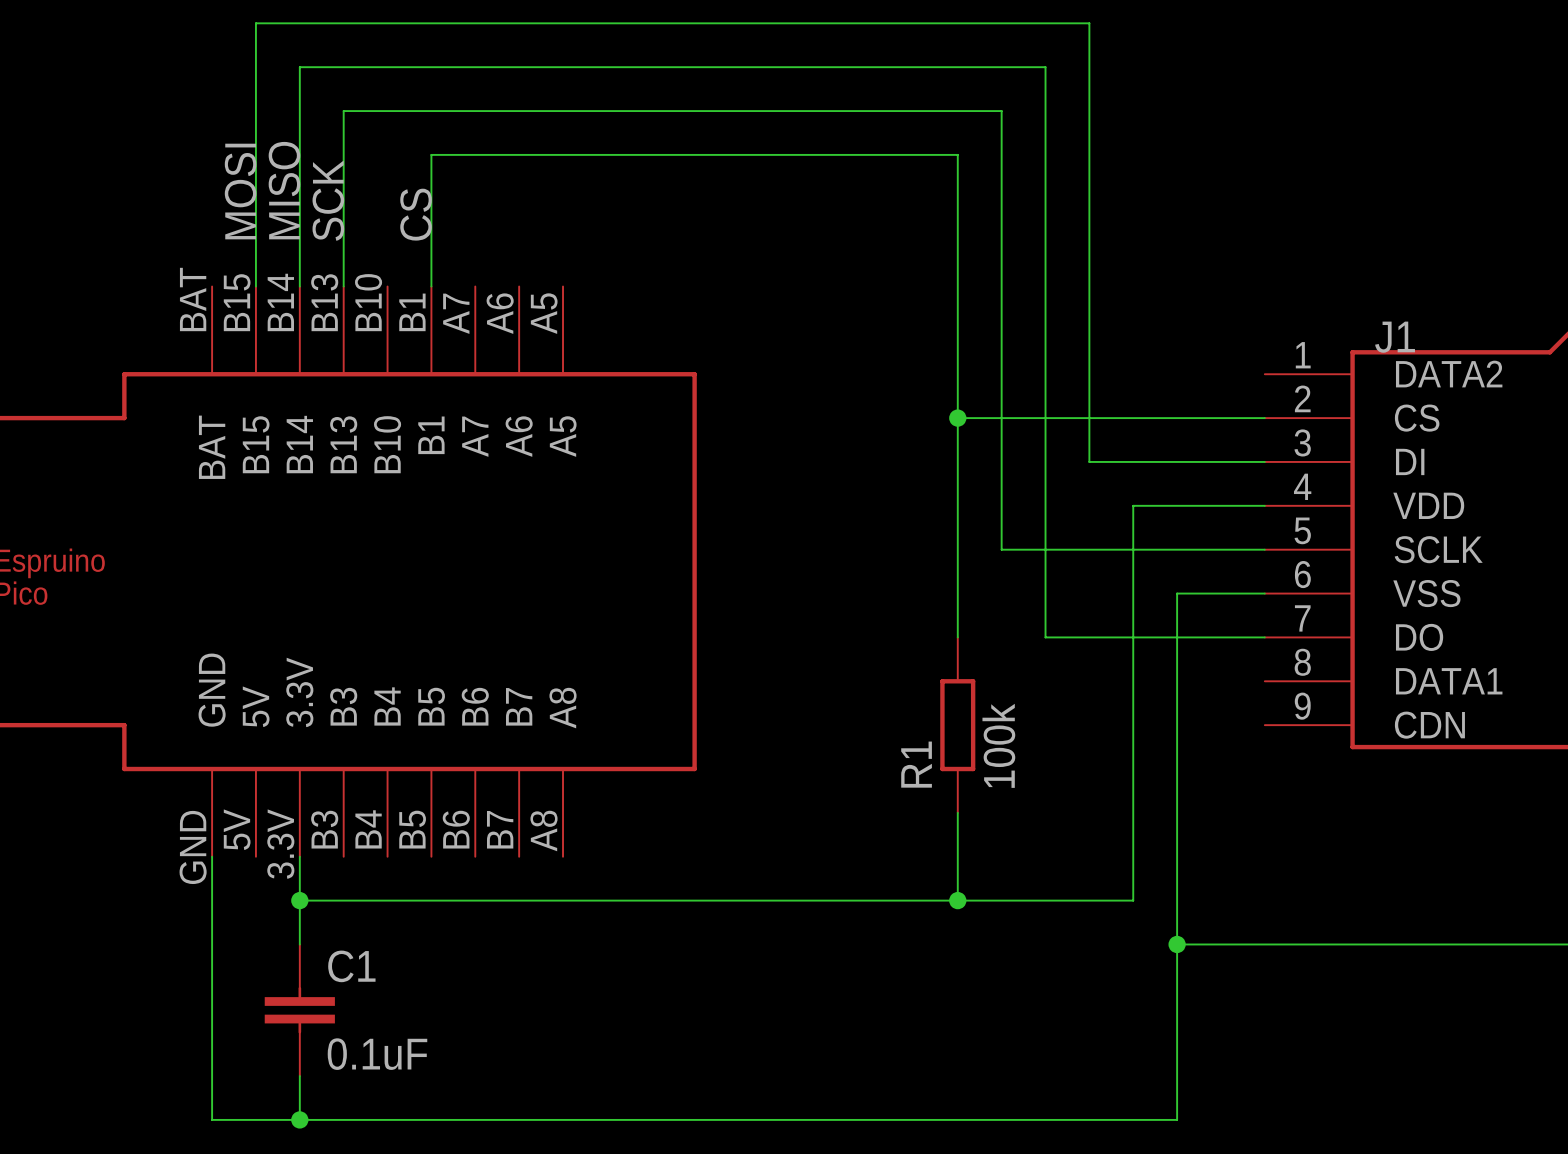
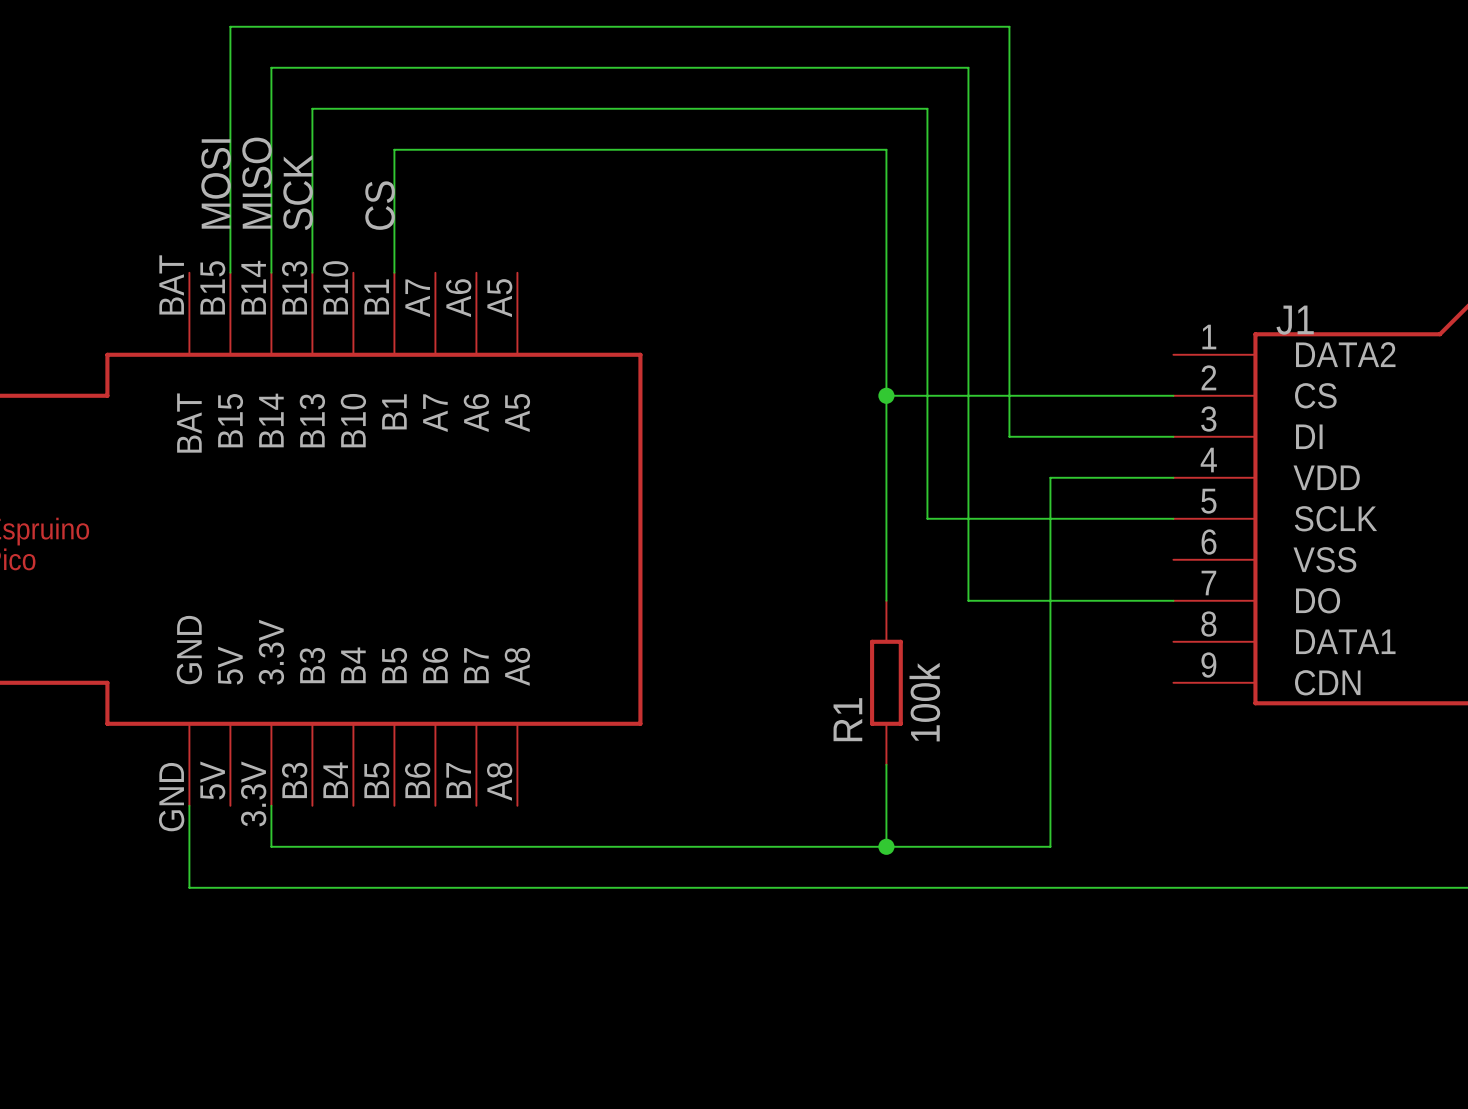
wire: (1264, 593) (1177, 593) (1177, 1119) (212, 1119) (212, 944) -> (1091, 887) (189, 887)
wire: (299, 900) (299, 944) -> none
junction: (299, 900) -> none
junction: (1177, 944) -> none
C1: 0.1uF (299, 1010) -> none
wire: (299, 1076) (299, 1119) -> none
junction: (299, 1119) -> none

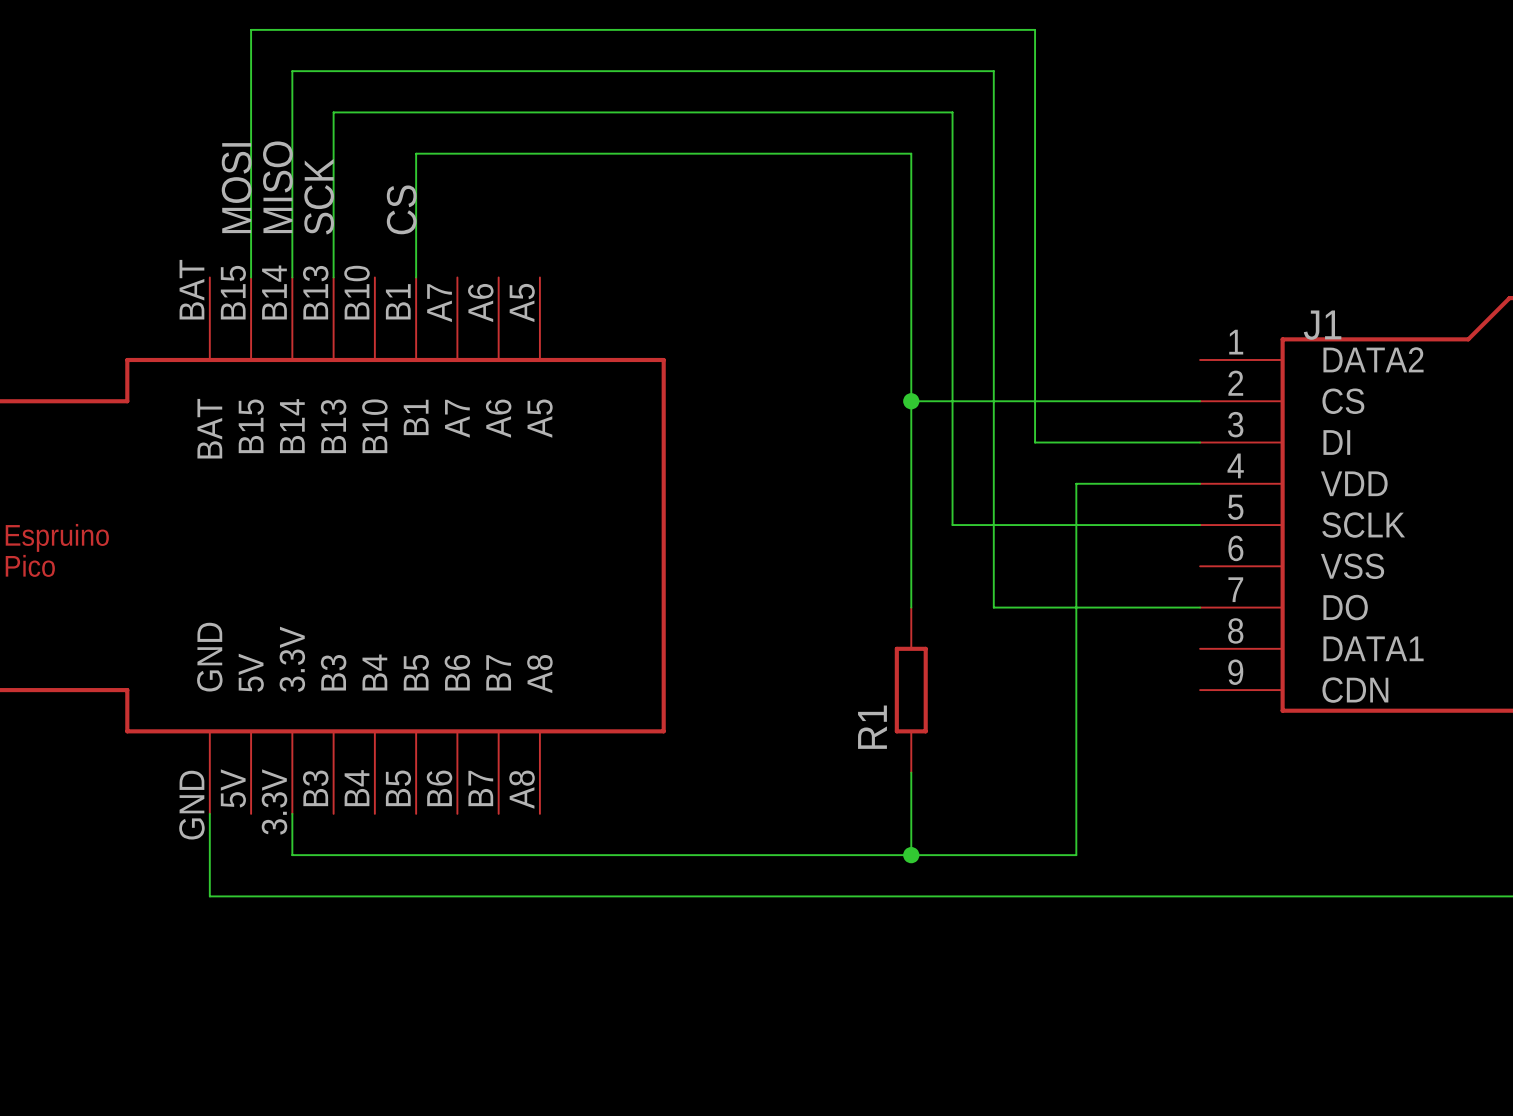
R1 value: 100k (924, 702) -> none

